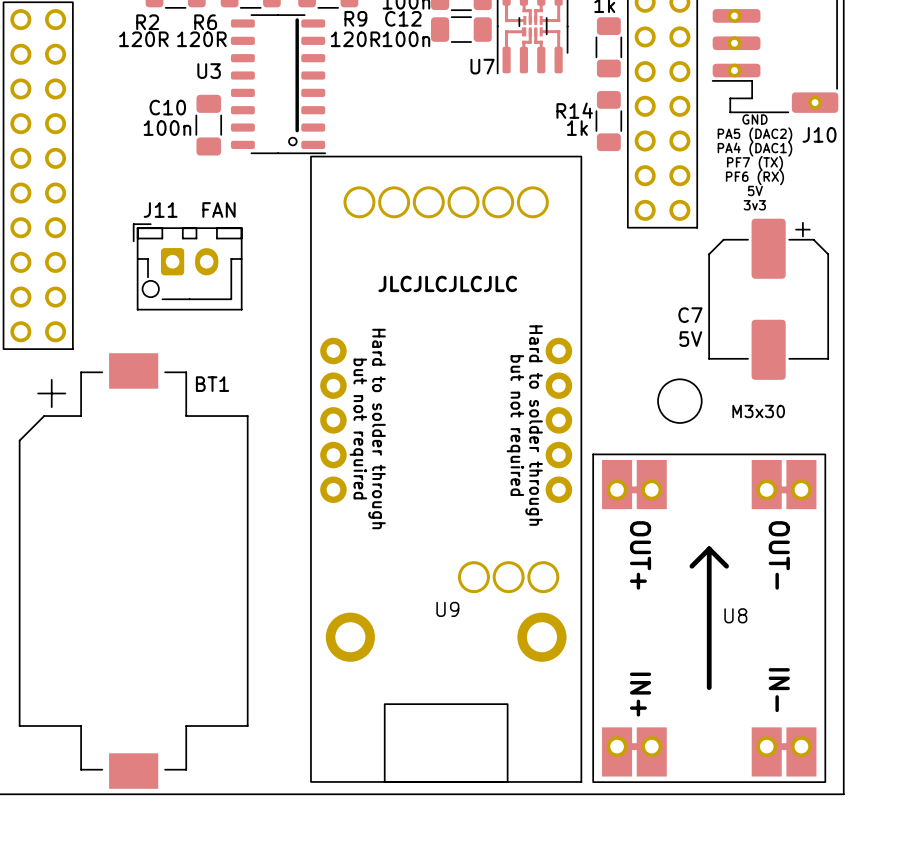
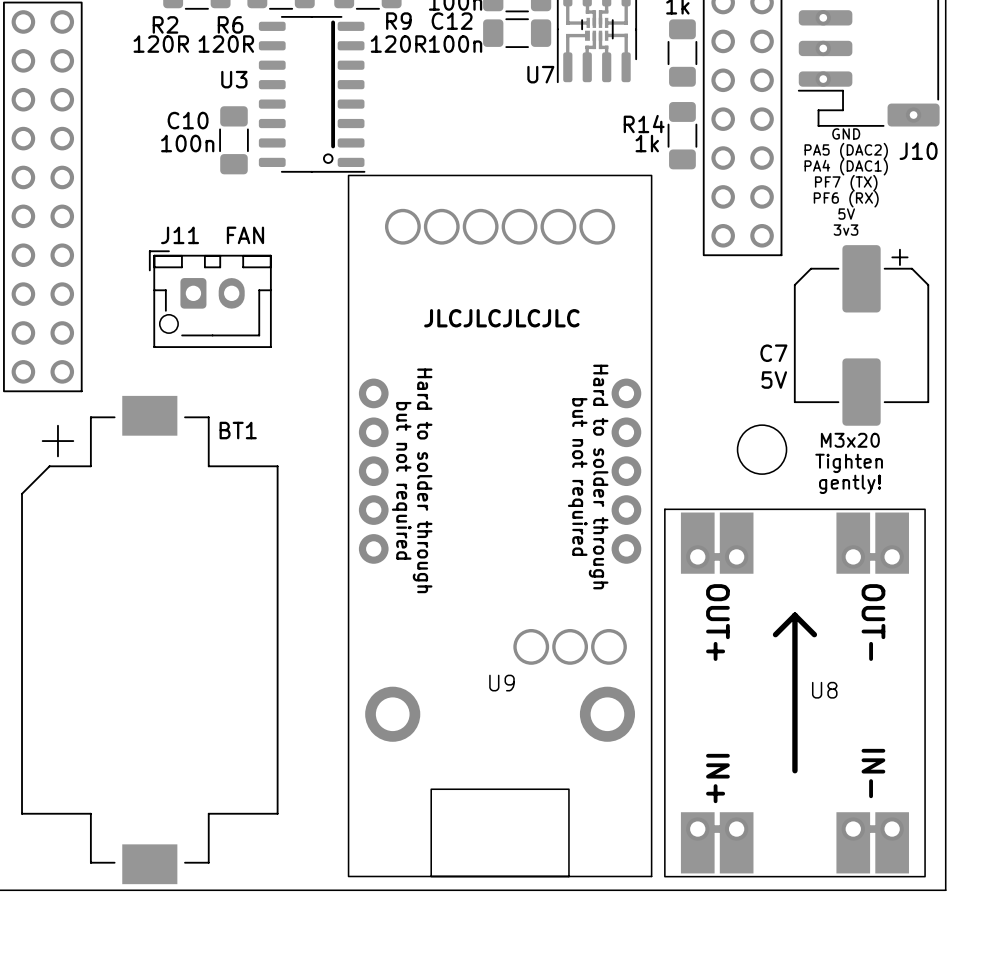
text: none -> M3x20 (850, 440)
text: M3x30 (758, 411) -> Tighten (849, 463)
text: none -> gently! (850, 484)
U8 footprint: [592, 453, 826, 783] -> [664, 508, 926, 878]

